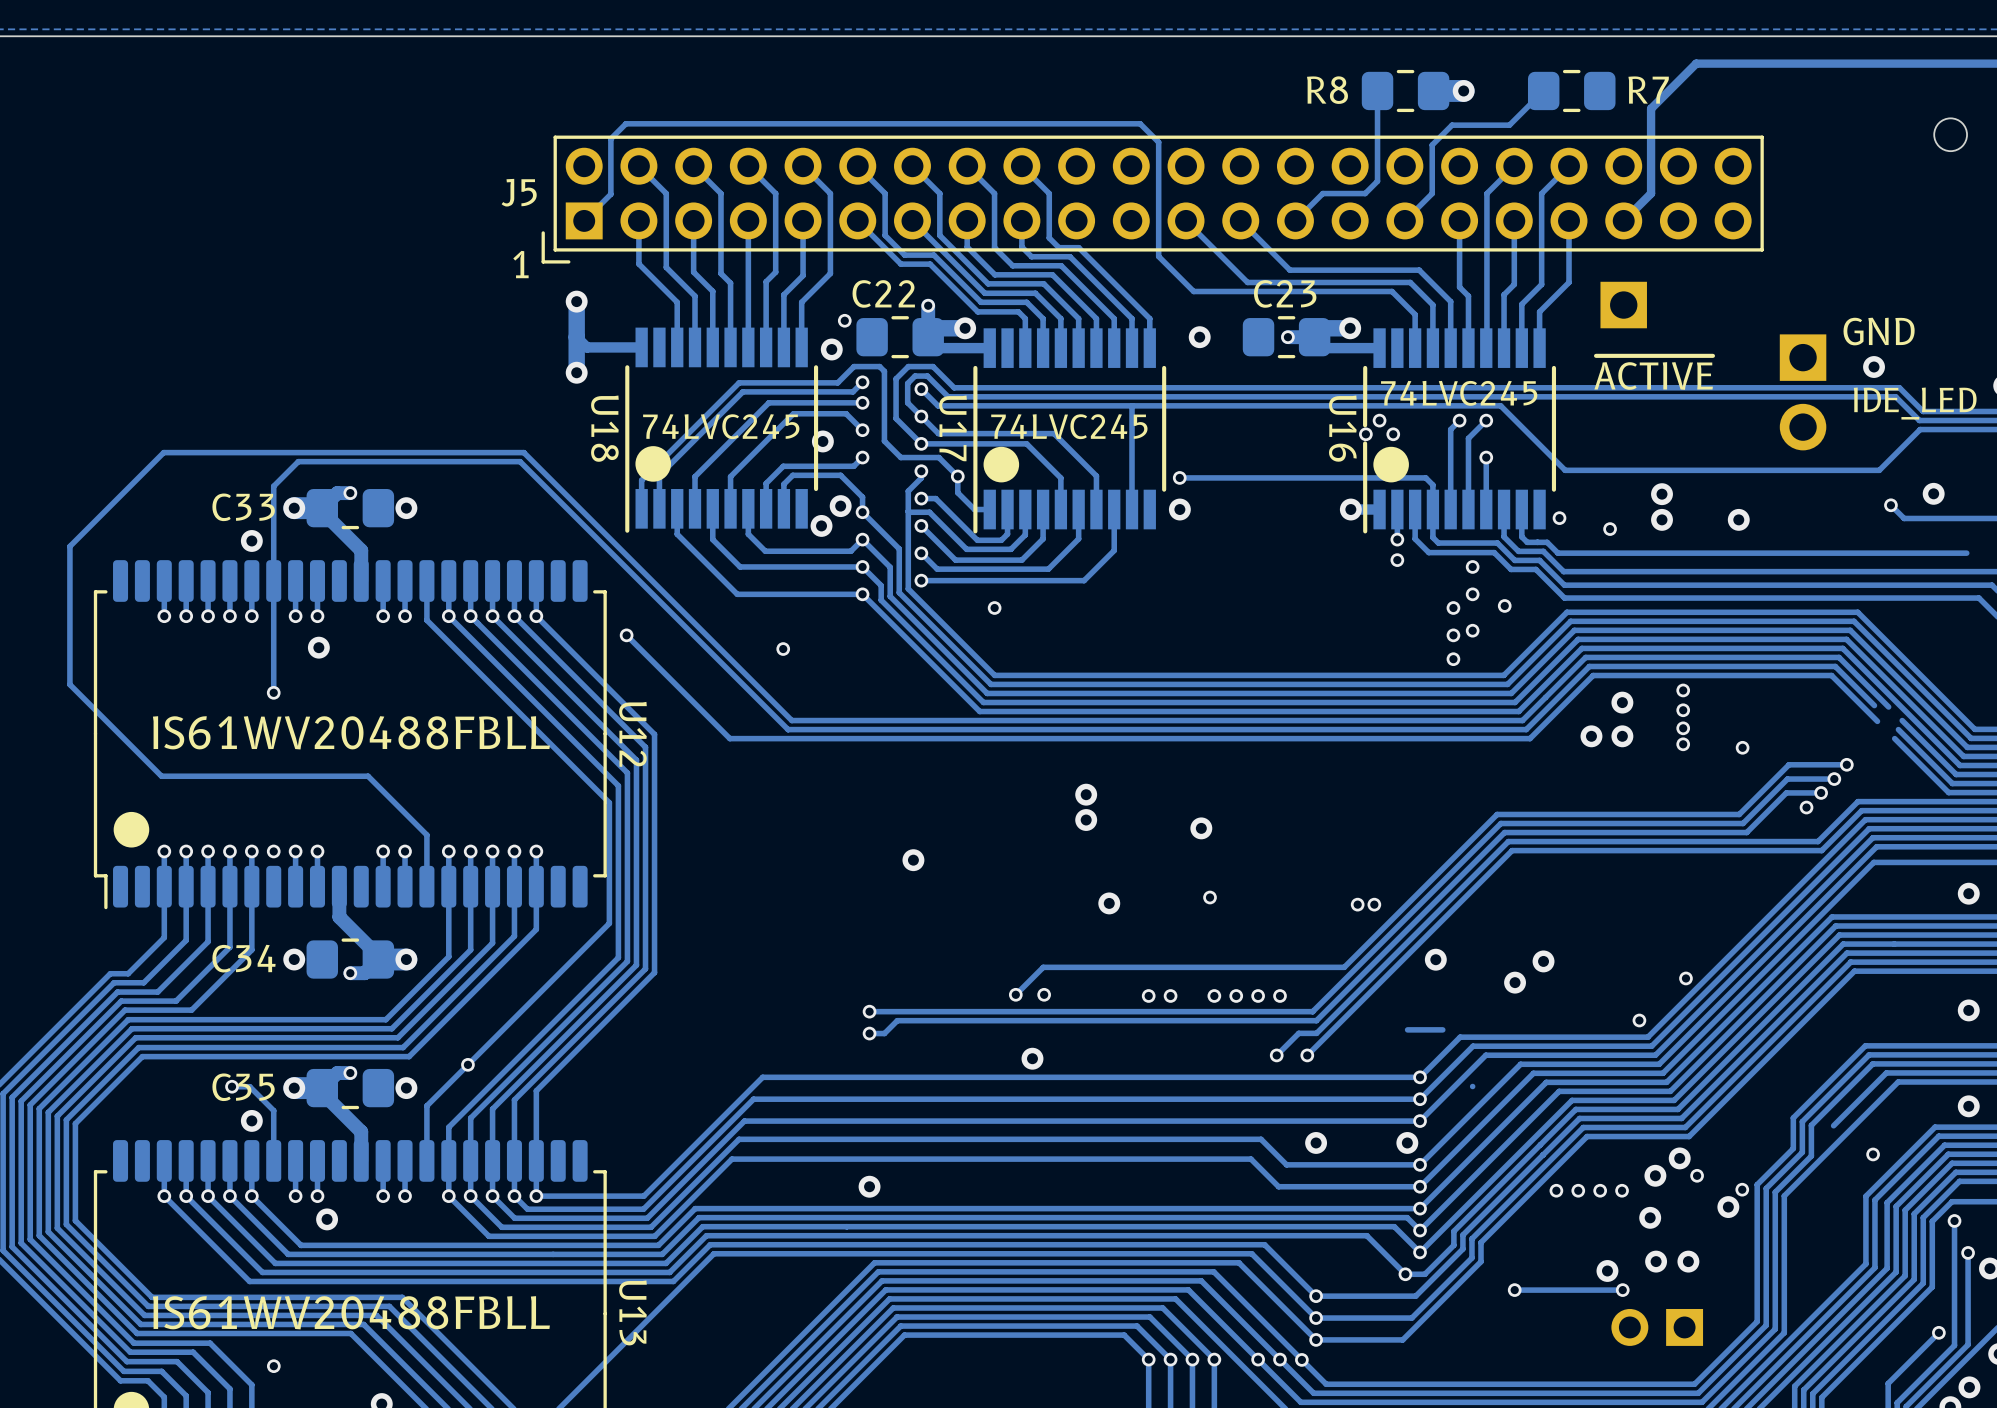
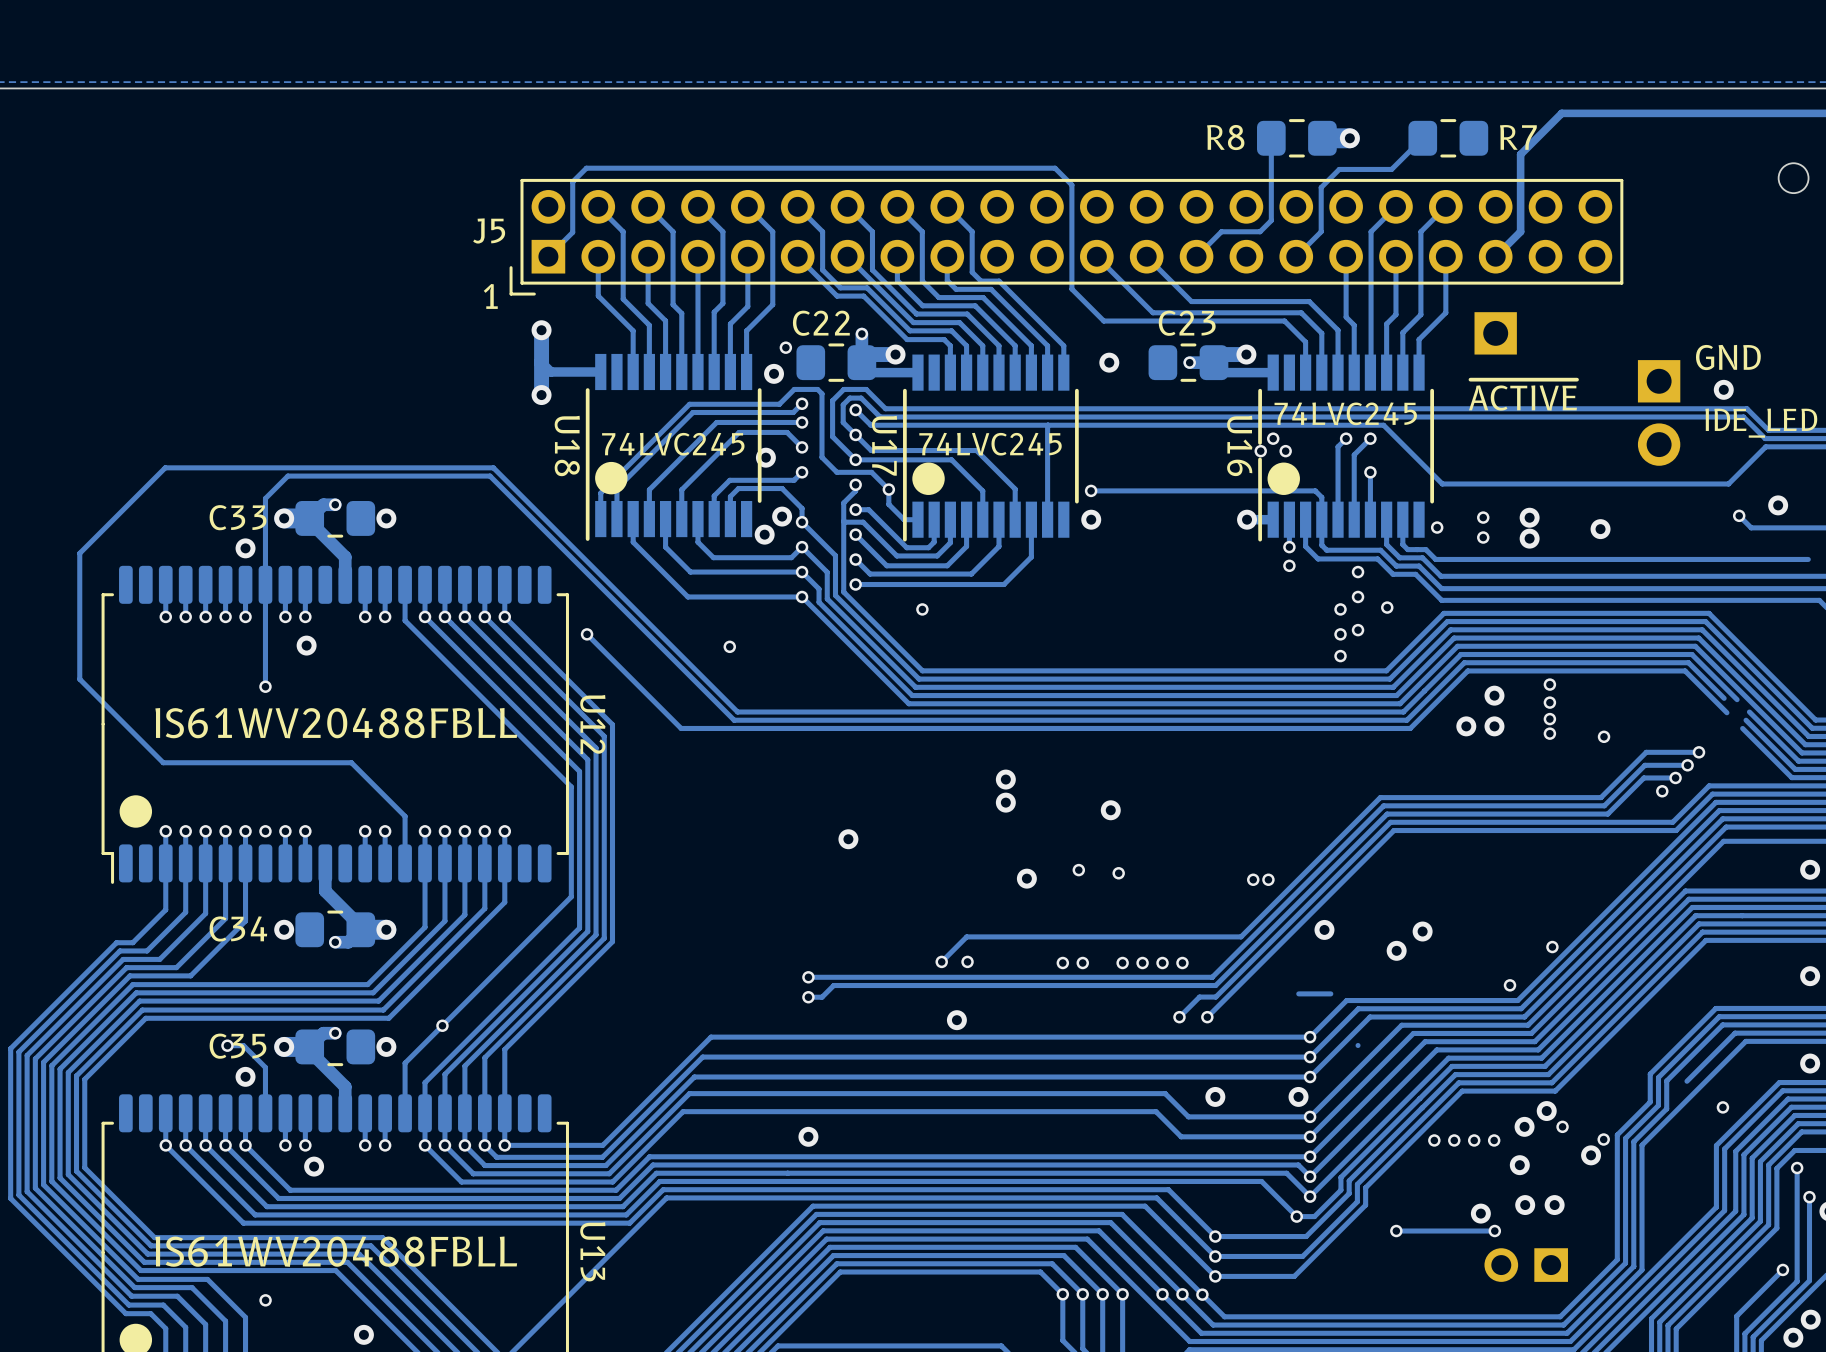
via: (1662, 494) -> none
via: none -> (1483, 517)
via: none -> (1529, 517)
via: (1662, 519) -> none
via: none -> (1529, 538)
via: none -> (1078, 870)

